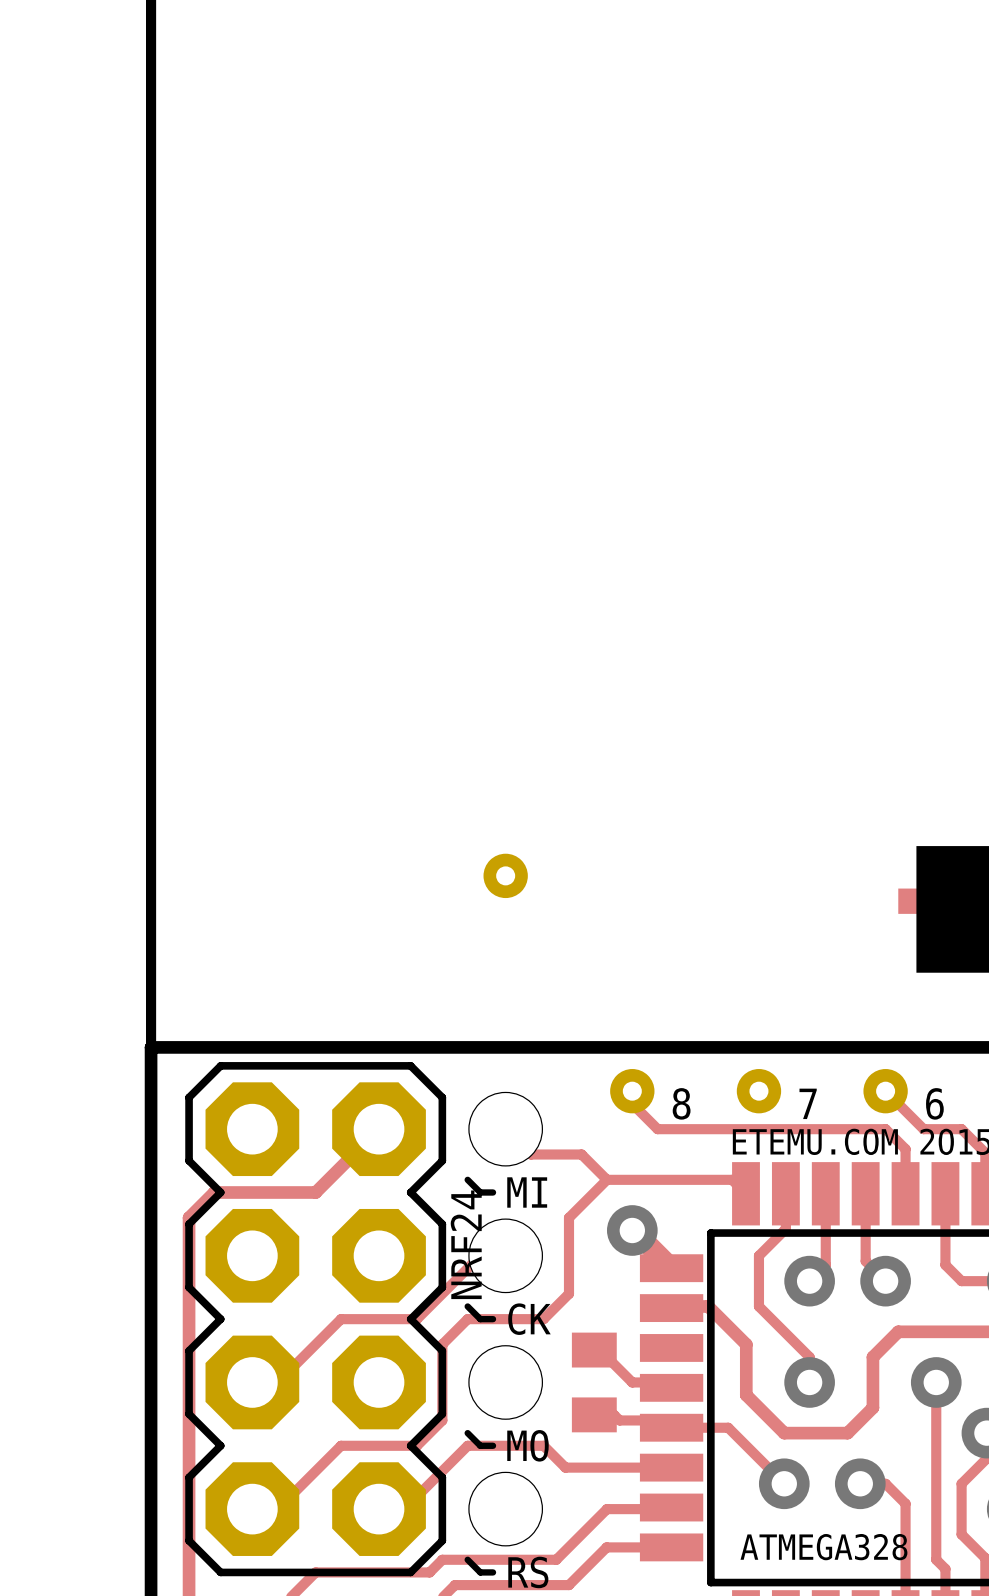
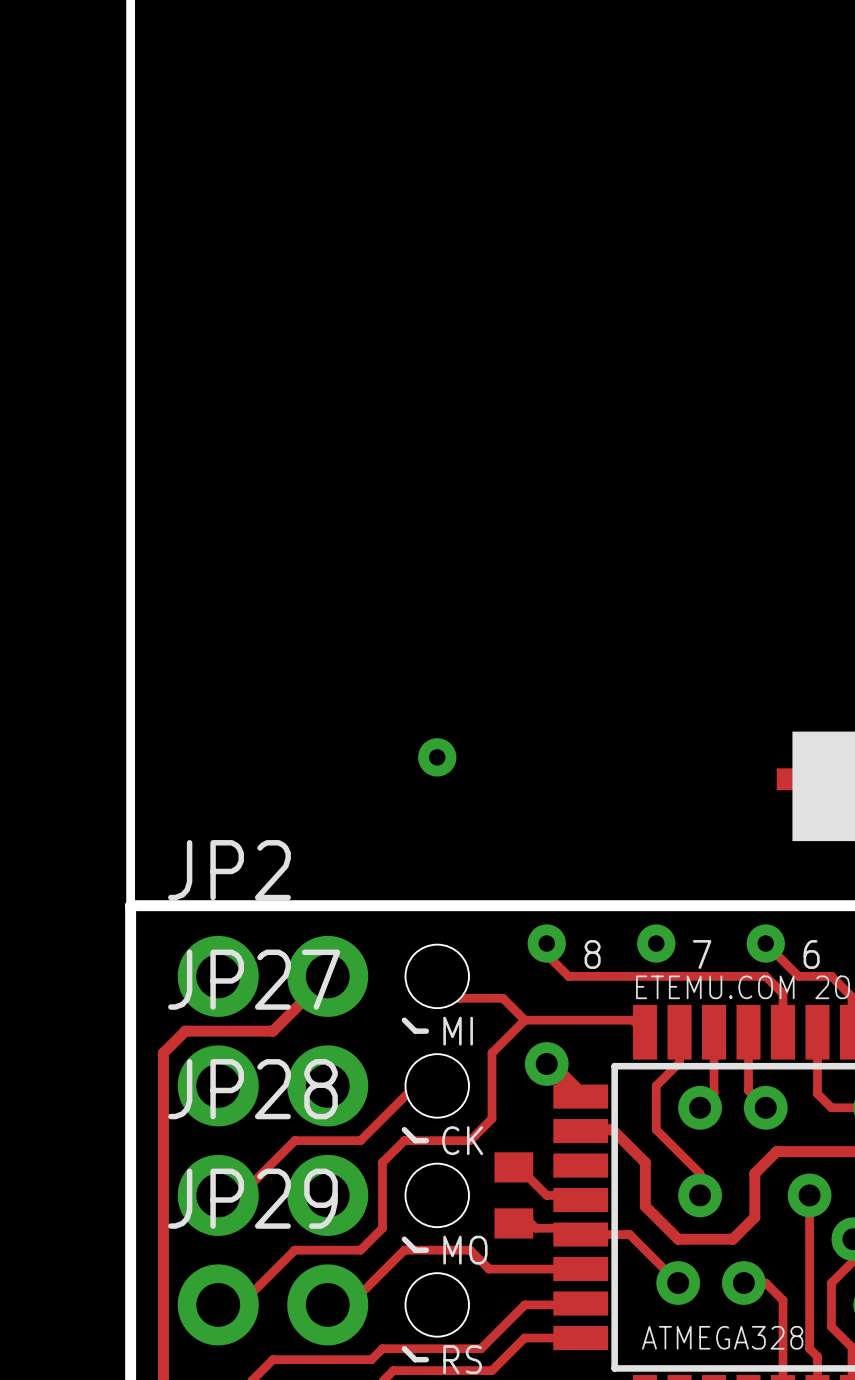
JP2: none -> (272, 976)
JP27: none -> (272, 1085)
NRF24: (315, 1319) -> none
JP28: none -> (272, 1195)
JP29: none -> (272, 1304)

